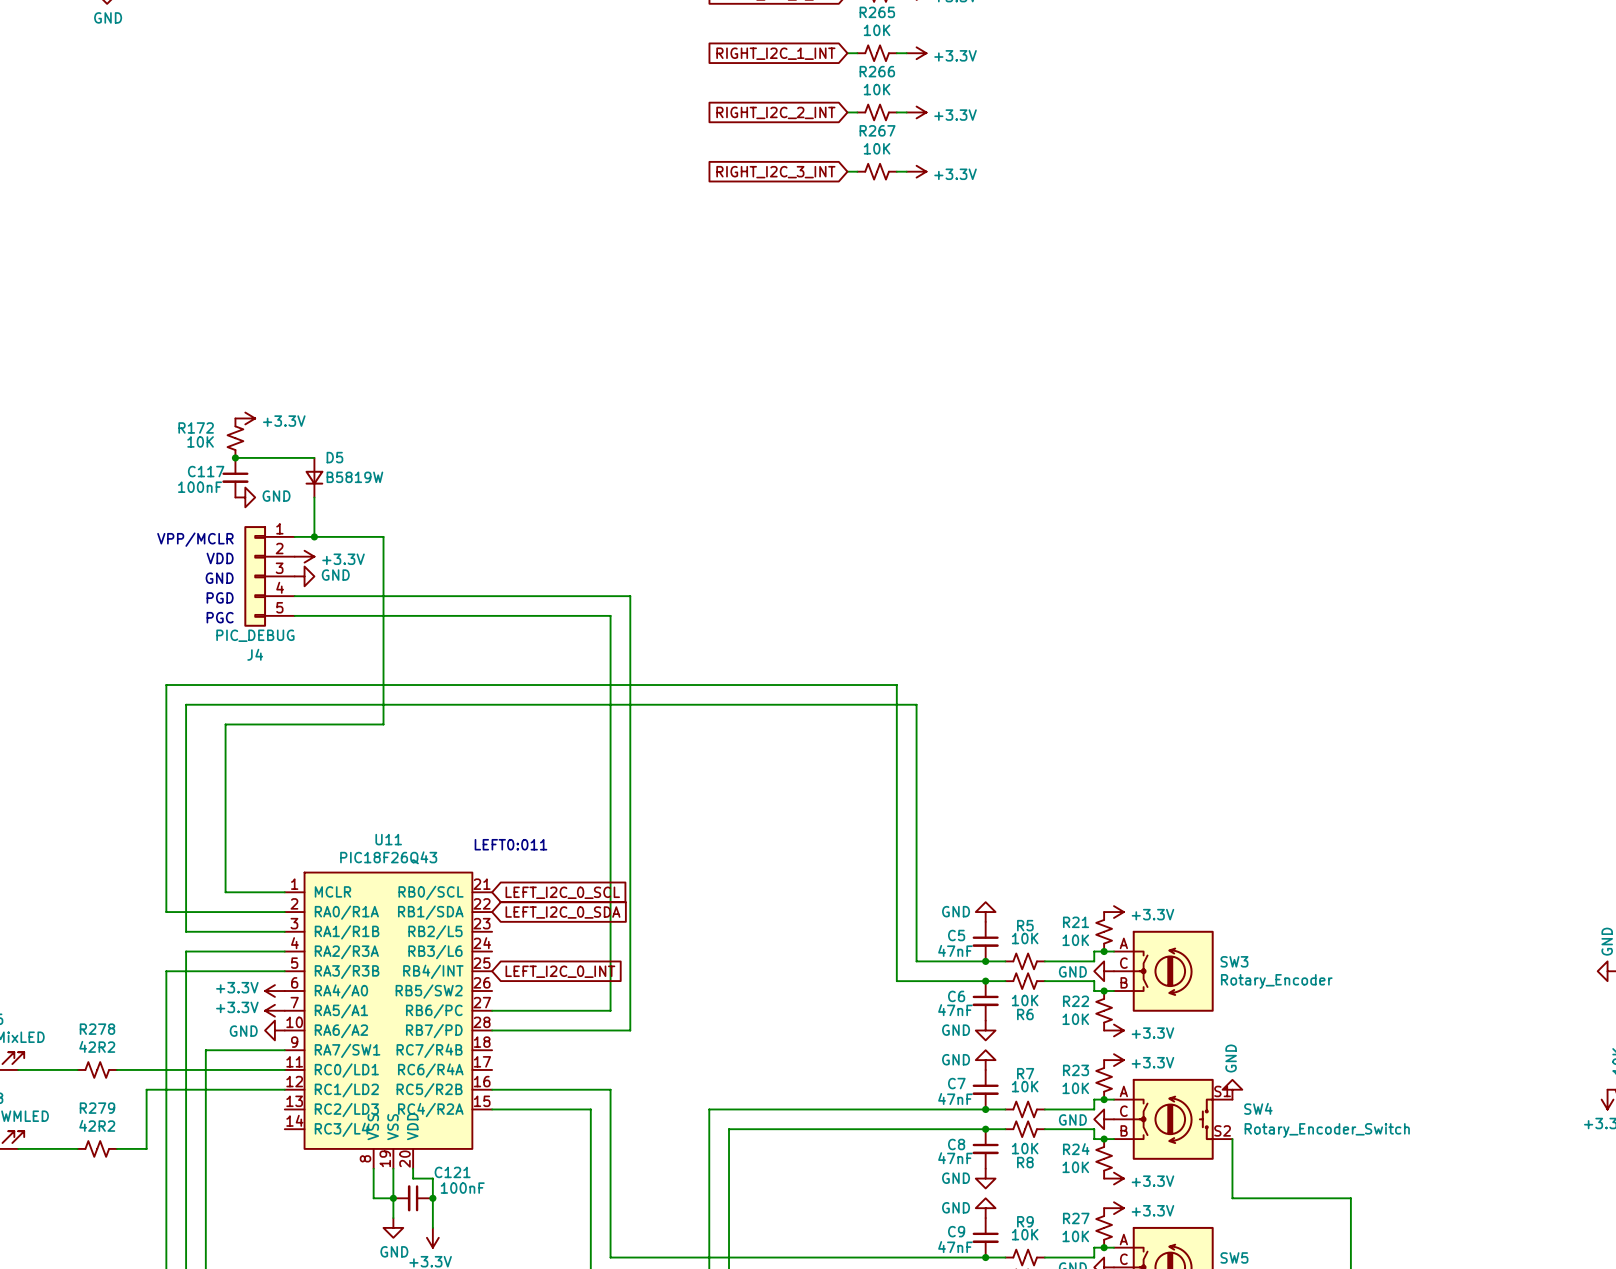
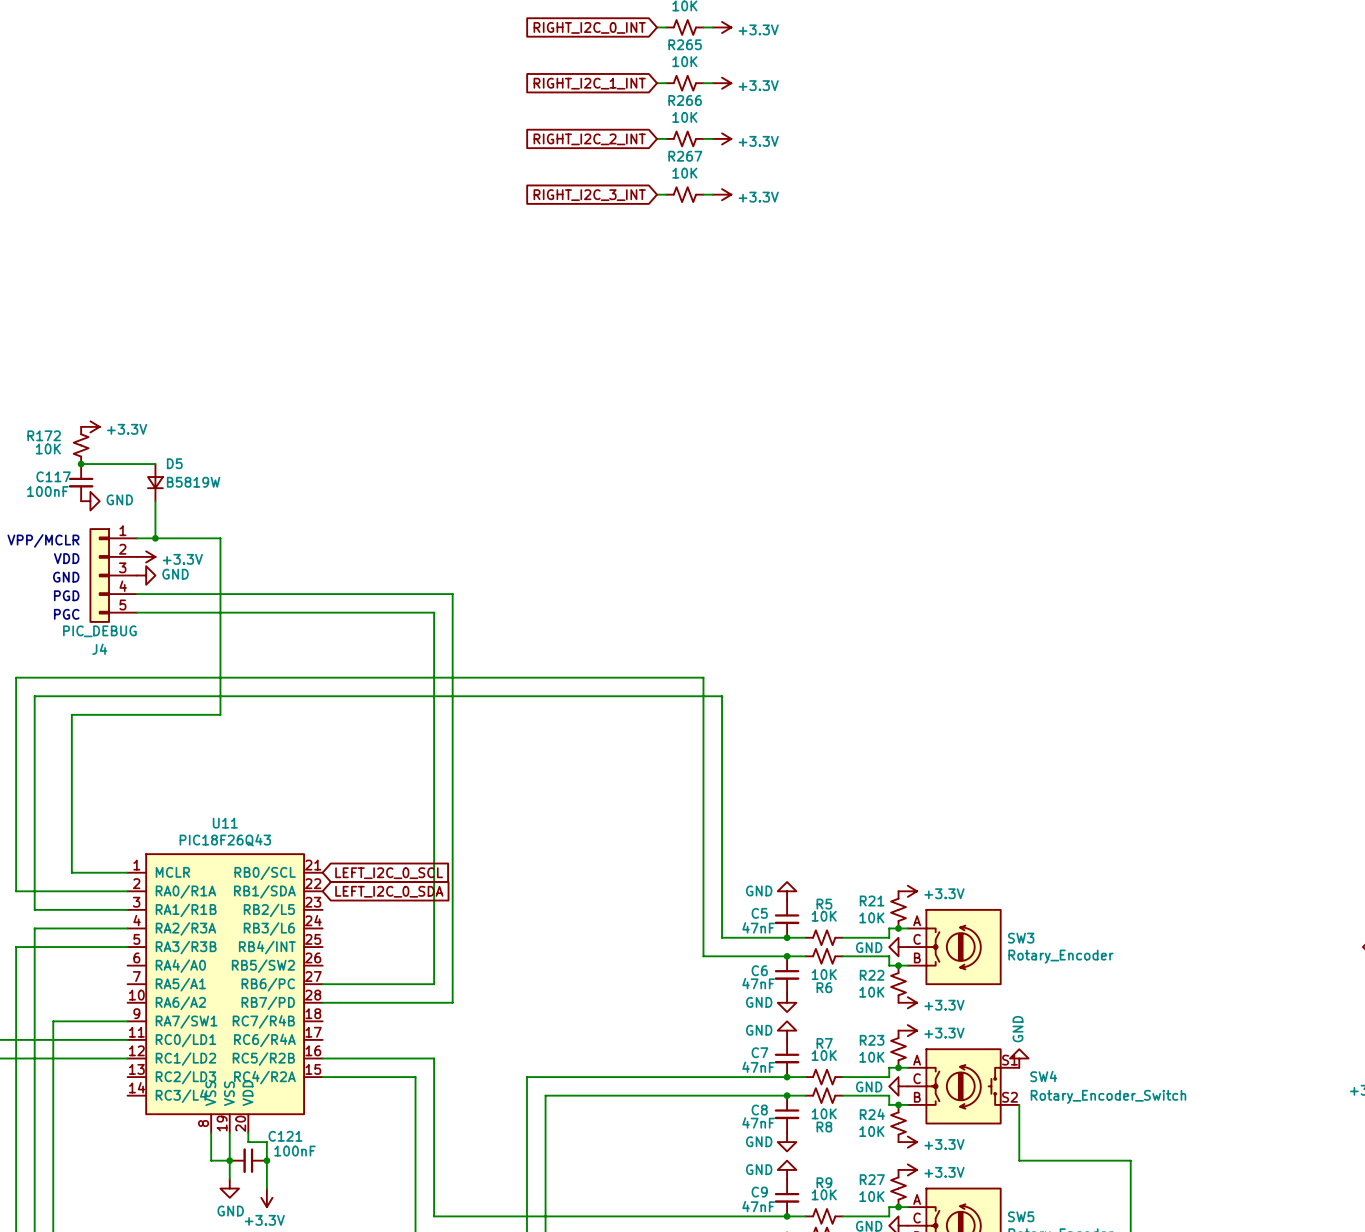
text: LEFT0:011 (510, 844) -> none
global label: LEFT_I2C_0_INT (560, 971) -> none
power symbol: +3.3V (274, 991) -> none
power symbol: +3.3V (274, 1010) -> none
power symbol: GND (274, 1030) -> none

